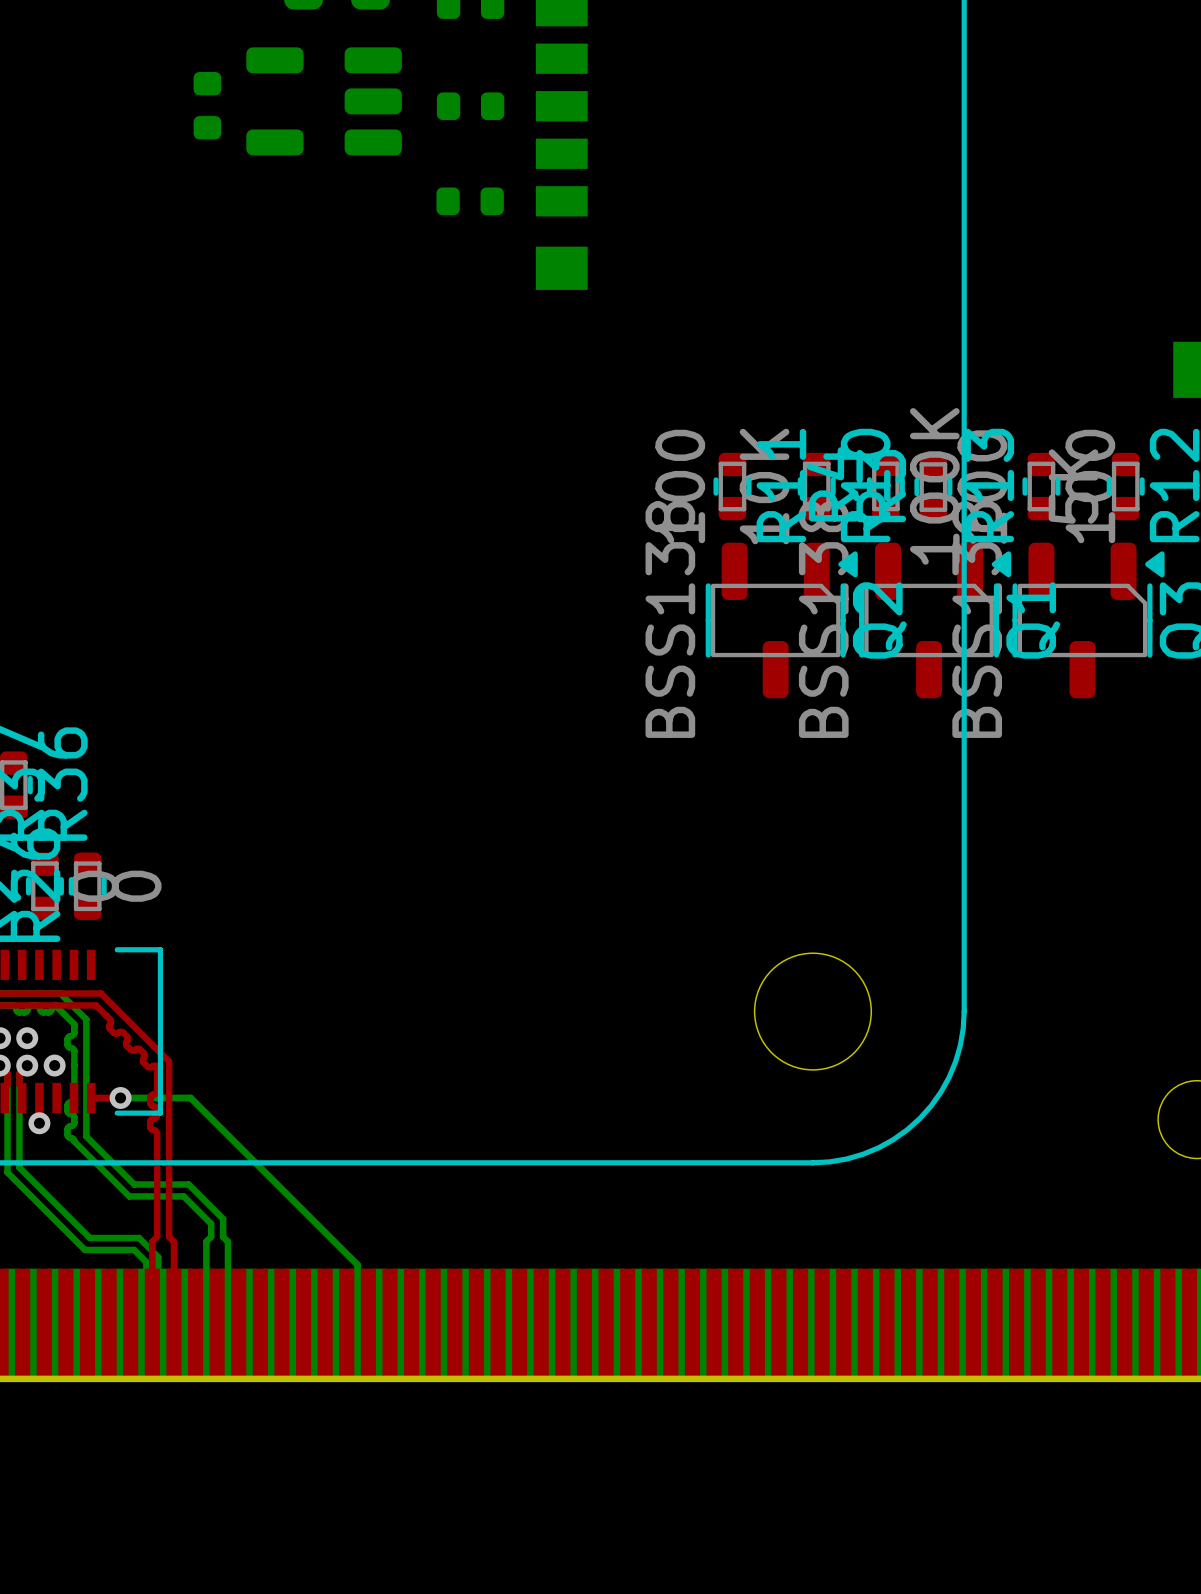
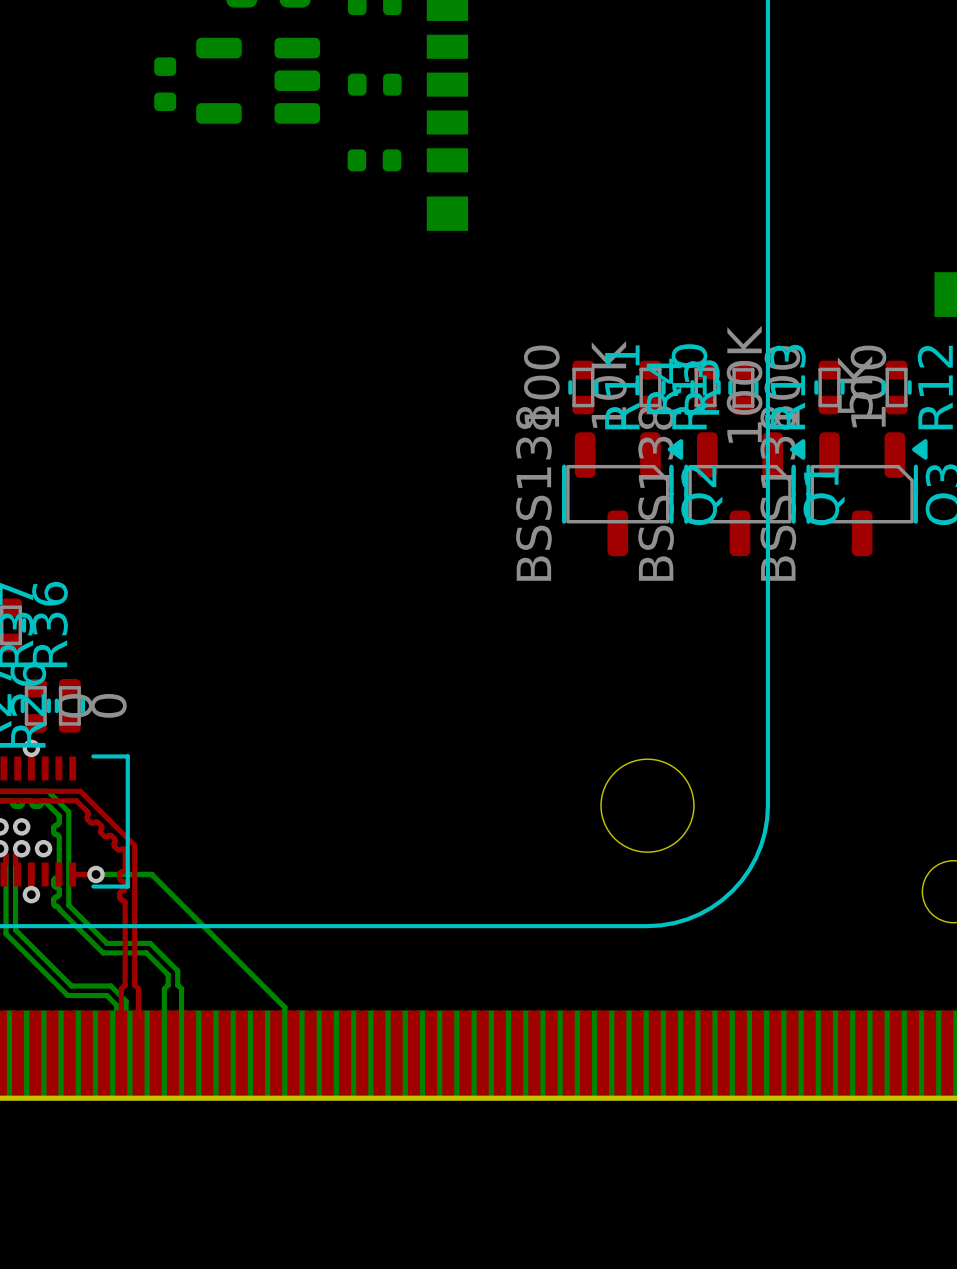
via: none -> (31, 748)

